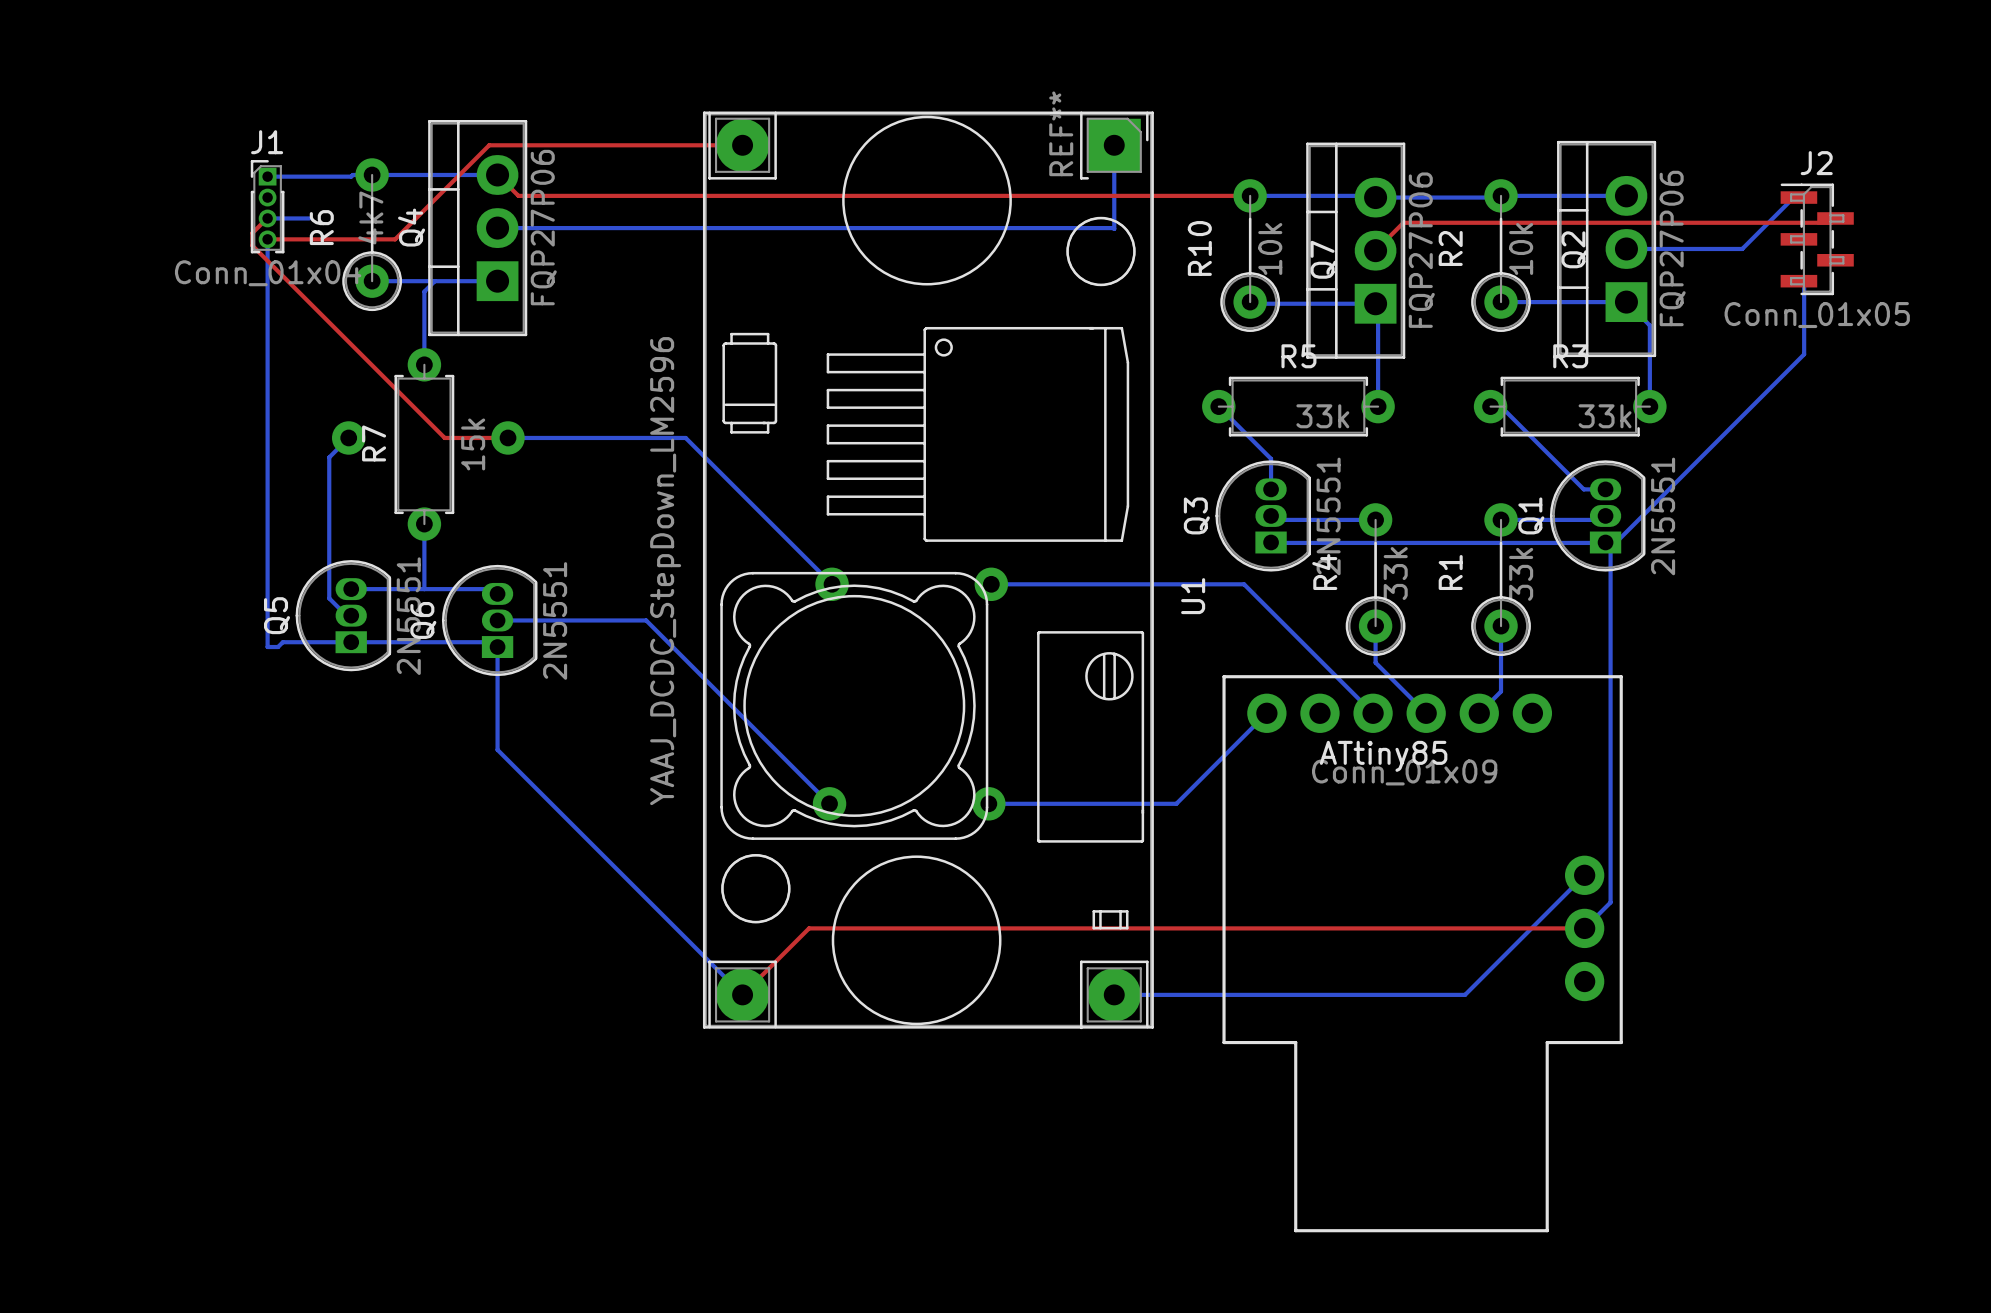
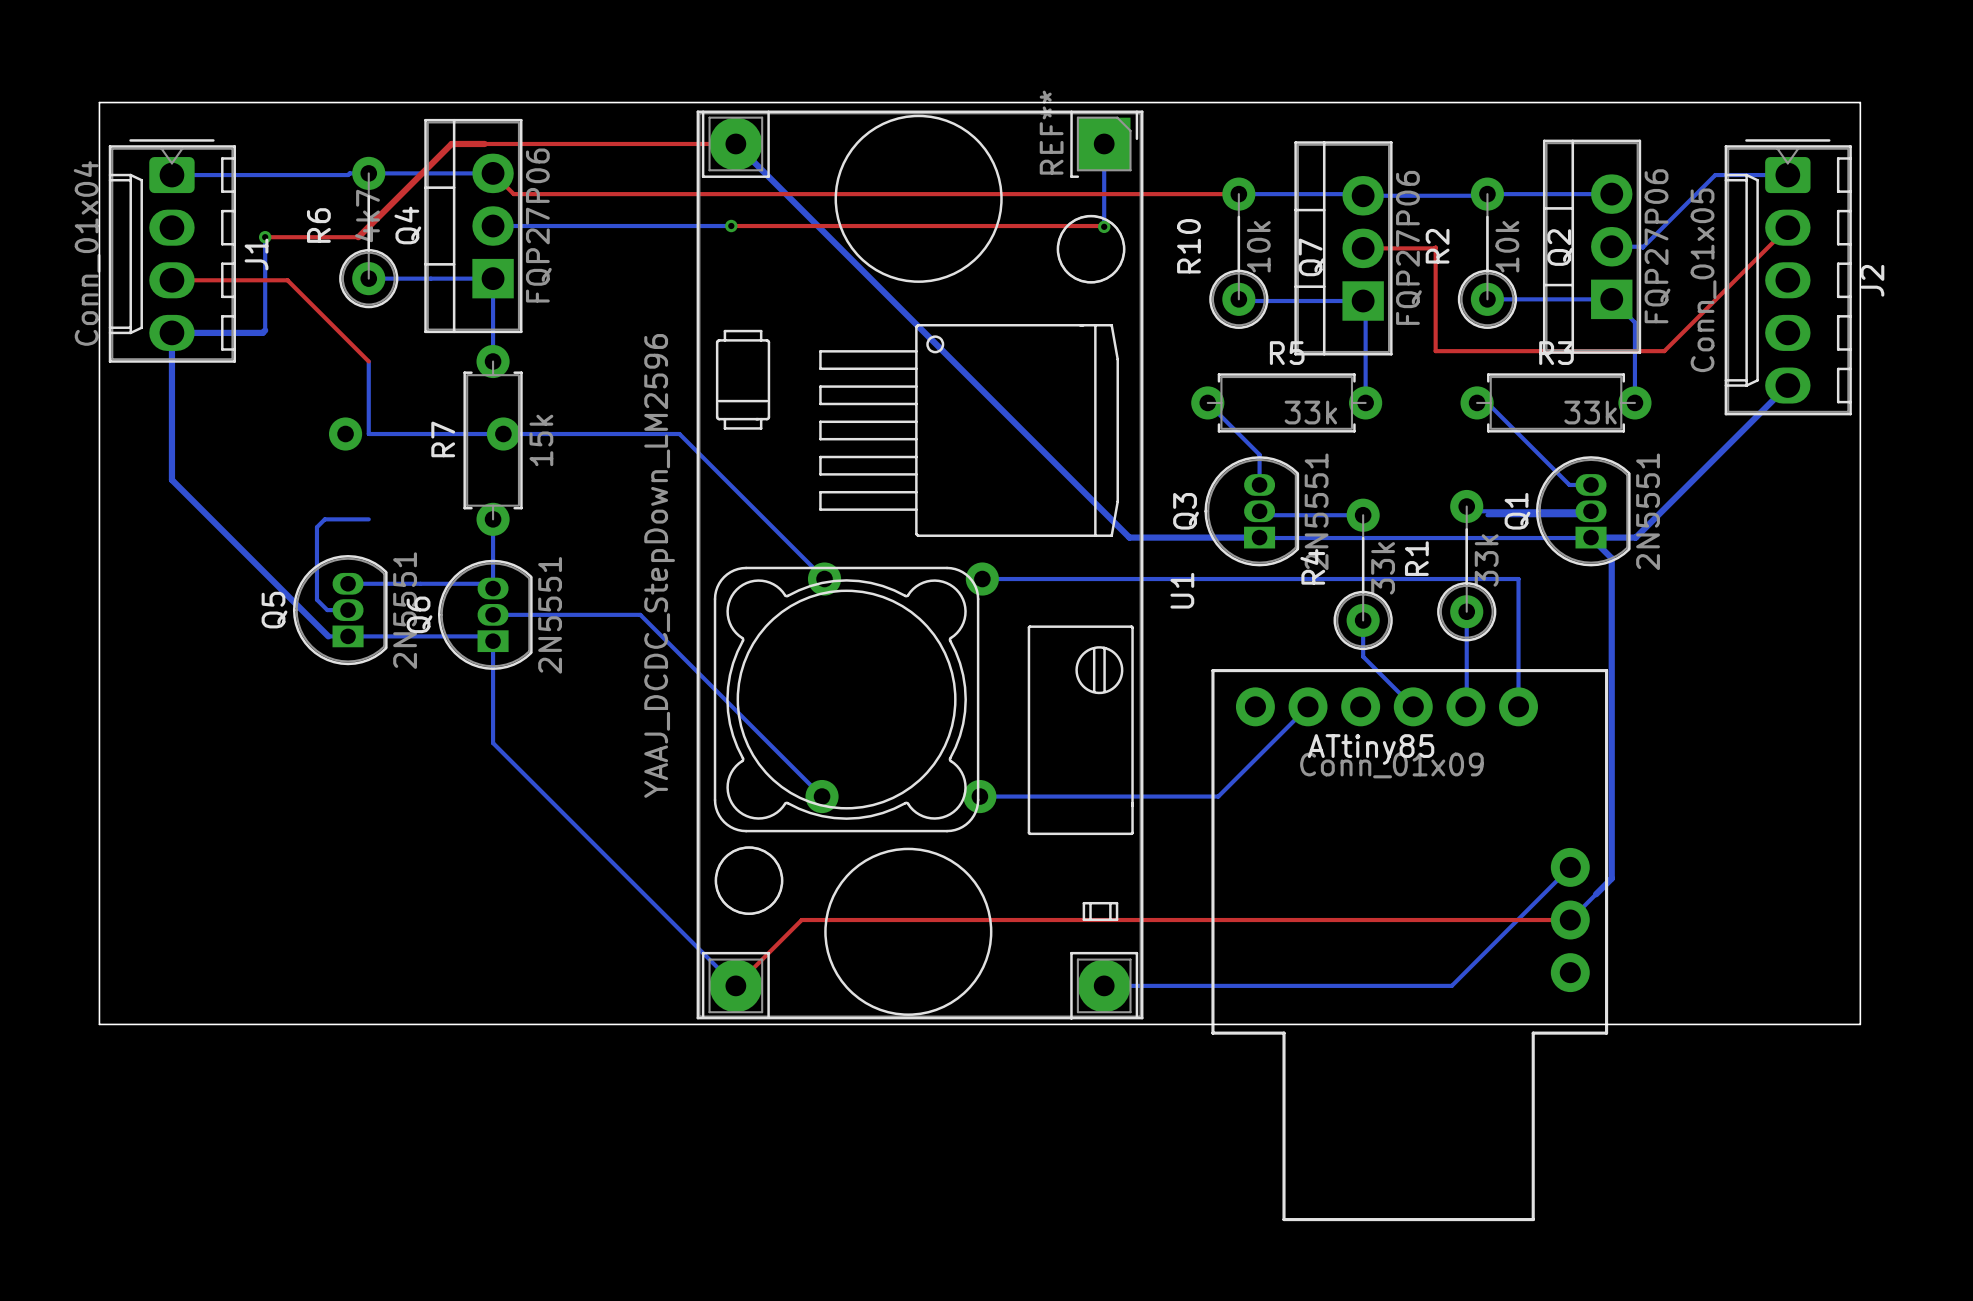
board edge: none -> (99, 102) (1860, 102) (1860, 1024) (99, 1024) (99, 102)
J1 name position: J1 (267, 142) -> J1 (256, 254)
top track: (489, 145) (395, 239) (361, 239) -> (484, 143) (451, 143) (358, 237)
bottom track: none -> (735, 143) (1129, 537) (1259, 537)
J1 footprint: [250, 160, 285, 254] -> [108, 139, 236, 363]
J2 name position: J2 (1816, 163) -> J2 (1872, 280)
bottom track: none -> (171, 175) (265, 175)
J2 footprint: [1780, 183, 1854, 296] -> [1724, 139, 1852, 416]
bottom track: (1793, 197) (1742, 248) (1656, 248) -> (1787, 175) (1715, 175) (1641, 246)
bottom track: (267, 218) (309, 218) -> none
top track: (267, 218) (252, 233) (252, 245) (444, 437) (508, 437) -> none
top track: (1835, 218) (1831, 222) (1403, 222) (1375, 250) -> (1787, 227) (1664, 351) (1435, 351) (1435, 247) (1363, 248)
bottom track: (737, 228) (1113, 228) -> none
top track: none -> (731, 226) (1104, 226)
via: none -> (731, 226)
via: none -> (1104, 226)
via: none -> (265, 237)
J1 value position: Conn_01x04 (268, 272) -> Conn_01x04 (87, 253)
bottom track: (434, 281) (424, 291) (424, 364) -> none
bottom track: none -> (493, 278) (493, 361)
bottom track: (1804, 281) (1804, 354) (1616, 542) -> (1787, 385) (1635, 537) (1601, 537)
top track: none -> (171, 280) (287, 280) (368, 361)
J2 value position: Conn_01x05 (1817, 315) -> Conn_01x05 (1703, 280)
bottom track: (267, 333) (267, 647) (278, 647) (282, 642) (331, 642) -> (265, 330) (262, 332) (171, 332) (171, 479) (328, 636)
bottom track: none -> (368, 361) (368, 434) (503, 434)
bottom track: (348, 437) (329, 457) (329, 598) (346, 615) -> (368, 519) (324, 519) (316, 527) (316, 599) (327, 610) (343, 610)
R7 position: (424, 444) -> (493, 440)
bottom track: none -> (1591, 511) (1470, 511) (1466, 515)
bottom track: (424, 524) (424, 589) -> none
bottom track: none -> (493, 519) (493, 588)
bottom track: (1610, 547) (1610, 902) -> (1596, 542) (1611, 558) (1611, 878) (1596, 894)
R1 position: (1501, 579) -> (1466, 565)
bottom track: (1244, 584) (1373, 713) -> (1232, 579) (1518, 579) (1518, 706)
bottom track: (1501, 626) (1501, 691) (1480, 712) -> (1466, 620) (1466, 706)
bottom track: (1266, 713) (1176, 803) -> (1308, 706) (1218, 796) (1165, 796)

